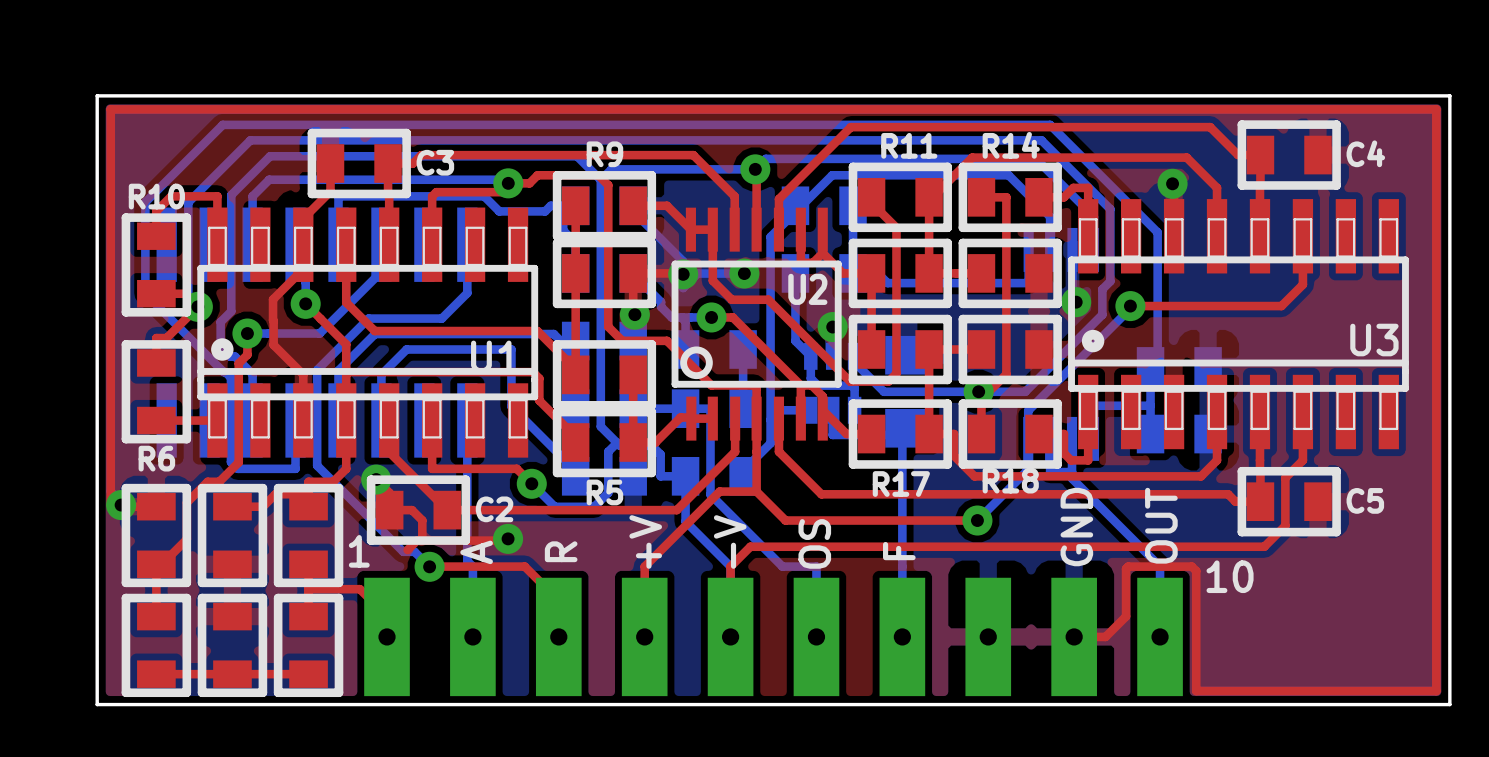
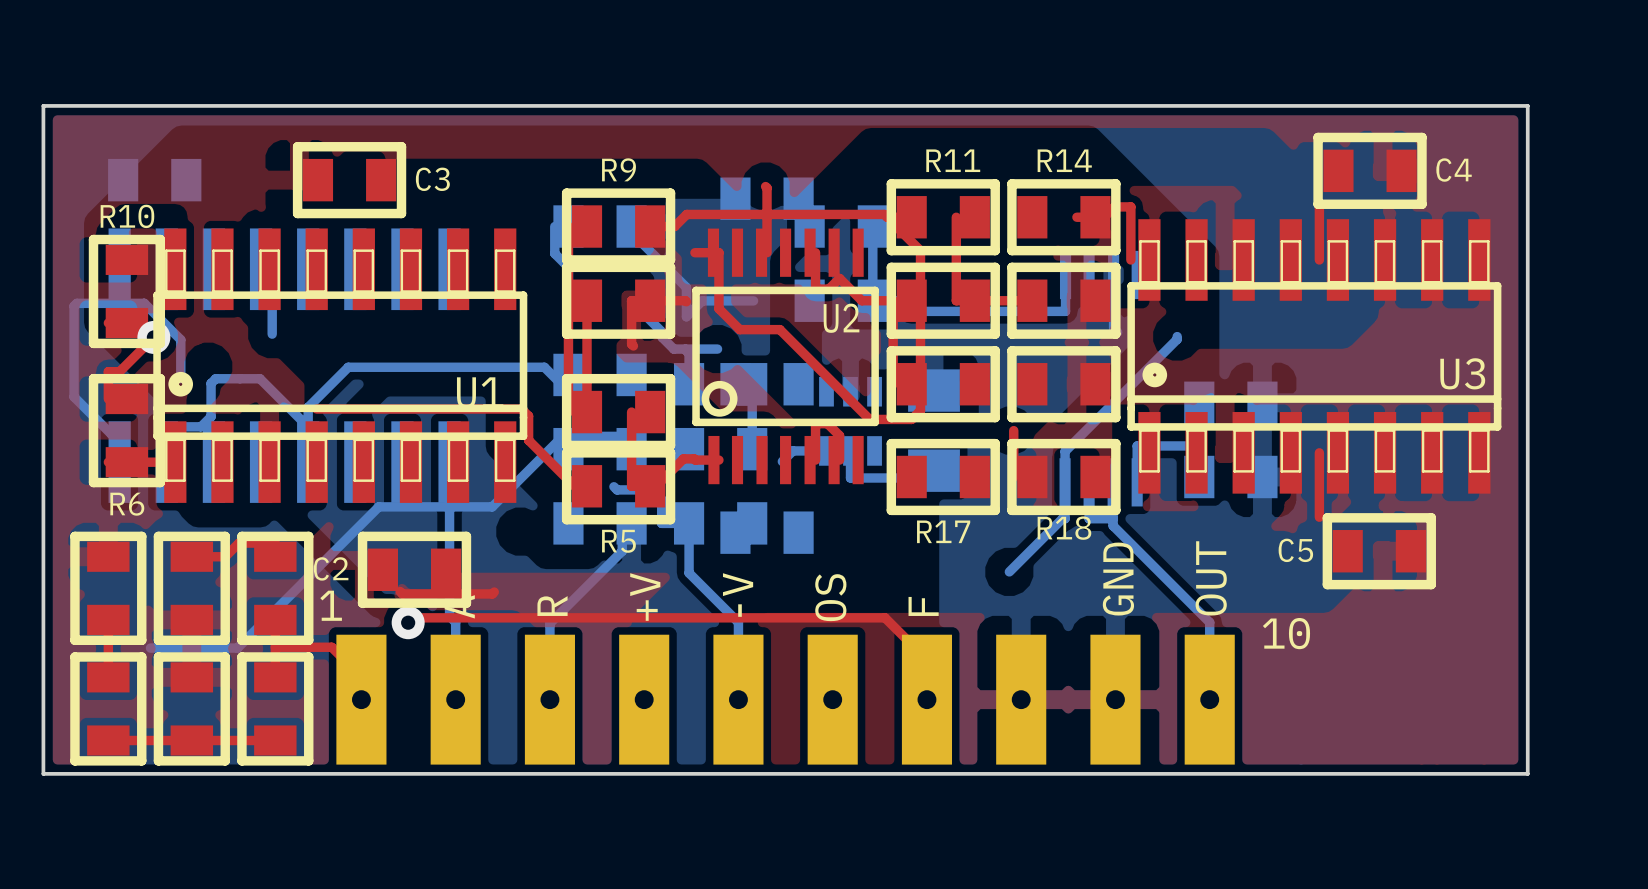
C4 position: (1289, 155) -> (1370, 170)
part: none -> (154, 180)
top track: (330, 163) (330, 191) (303, 218) (303, 269) (273, 299) (273, 345) (303, 374) (303, 420) -> none
C3 position: (359, 163) -> (349, 180)
via: (755, 169) -> none
bottom track: (600, 180) (600, 426) (617, 442) (608, 451) (608, 492) (594, 506) (554, 506) (531, 483) -> none
bottom track: (600, 180) (611, 169) (755, 169) (765, 158) (1036, 158) (1093, 216) (1093, 249) -> none
bottom track: (600, 180) (577, 156) (270, 156) (231, 195) (231, 311) (220, 322) (220, 347) (230, 356) (235, 356) (252, 374) (252, 420) -> none
part: none -> (767, 198)
bottom track: (508, 183) (504, 179) (269, 179) (252, 196) (252, 244) -> none
via: (508, 183) -> none
via: (1172, 183) -> none
top track: (1260, 185) (1260, 155) (1238, 155) (1210, 127) (850, 127) (778, 199) (778, 229) -> none
R11 position: (900, 197) -> (943, 217)
top track: (981, 197) (1006, 197) (1006, 374) (988, 391) (978, 391) -> none
R14 position: (1010, 197) -> (1063, 217)
top track: (929, 200) (972, 157) (1186, 157) (1217, 187) (1217, 236) -> none
bottom track: (575, 205) (550, 205) (545, 211) (499, 211) (484, 196) (338, 196) (338, 244) -> none
R9 position: (604, 205) -> (618, 226)
top track: (667, 205) (690, 229) (690, 246) -> (668, 226) (674, 226) (686, 214) (884, 214) (887, 217) (911, 217)
top track: (734, 229) (734, 196) (693, 155) (421, 155) (412, 163) (388, 163) (389, 244) -> none
top track: (156, 236) (156, 211) (171, 196) (217, 196) (217, 244) -> none
top track: (1302, 236) (1302, 284) (1281, 306) (1130, 306) -> none
top track: (346, 244) (346, 302) (374, 331) (537, 331) (575, 369) -> none
bottom track: (381, 244) (381, 271) (319, 333) (247, 333) -> none
top track: (432, 244) (432, 196) (436, 192) (508, 192) (508, 183) (529, 183) (537, 175) (598, 175) (608, 185) (608, 326) (622, 340) (666, 340) (711, 385) (754, 385) (756, 388) (756, 491) -> none
bottom track: (467, 244) (467, 293) (441, 318) (368, 318) (317, 370) (317, 465) (403, 551) (414, 551) (429, 566) -> none
bottom track: (1050, 249) (1050, 216) (1008, 175) (832, 175) (770, 236) (770, 443) (743, 470) (743, 476) -> none
R10 position: (156, 264) -> (126, 291)
top track: none -> (587, 300) (587, 412)
part position: (604, 273) -> (618, 300)
via: (744, 273) -> none
bottom track: (795, 273) (795, 341) (810, 356) (810, 378) (818, 385) (852, 385) (854, 388) (854, 410) -> none
part position: (900, 273) -> (943, 300)
part position: (1010, 273) -> (1063, 300)
via: (683, 274) -> none
via: (1076, 302) -> none
top track: (305, 303) (346, 344) (346, 468) (333, 481) (308, 481) (308, 506) -> none
via: (305, 303) -> none
bottom track: (197, 306) (188, 297) (188, 202) (250, 140) (1041, 140) (1110, 209) (1110, 281) (1102, 289) (1102, 314) (1025, 391) (883, 391) (854, 362) (854, 356) -> none
via: (1130, 306) -> none
via: (634, 314) -> none
top track: (711, 317) (732, 317) (800, 385) -> none
via: (711, 317) -> none
U2 position: (756, 324) -> (785, 356)
U3 position: (1238, 324) -> (1314, 356)
via: (832, 327) -> none
top track: (247, 333) (247, 354) (238, 363) (238, 462) (219, 481) (207, 481) (186, 502) (186, 539) (161, 564) (156, 564) -> none
via: (247, 333) -> none
bottom track: none -> (180, 378) (180, 339) (144, 303) (76, 303) (74, 306) (74, 396) (111, 434) (117, 434) (117, 482)
part: none -> (767, 384)
part position: (900, 349) -> (943, 384)
top track: (981, 349) (929, 349) (929, 434) (954, 434) (954, 455) (974, 476) (1201, 476) (1217, 460) (1217, 412) -> none
part position: (1010, 349) -> (1063, 384)
part position: (604, 374) -> (618, 412)
bottom track: none -> (180, 426) (201, 426) (211, 416) (211, 383) (215, 378) (259, 378) (315, 434) (321, 434)
R6 position: (156, 391) -> (126, 430)
via: (978, 391) -> none
bottom track: none -> (622, 436) (562, 436) (492, 506) (378, 506) (237, 648) (150, 648)
bottom track: (633, 408) (710, 408) (710, 494) (782, 566) (816, 566) (816, 636) -> none
top track: (822, 410) (846, 434) (871, 434) -> none
top track: (1088, 412) (1088, 460) (1071, 460) (1063, 453) (1063, 434) (1039, 434) -> none
top track: (1302, 412) (1302, 460) (1285, 477) (1285, 525) (1264, 546) (750, 546) (730, 566) (730, 636) -> none
top track: (735, 418) (735, 451) (676, 510) (447, 510) (389, 452) (389, 420) -> none
top track: (778, 418) (778, 451) (821, 494) (1228, 494) (1235, 501) (1260, 501) (1260, 471) -> none
bottom track: (295, 420) (295, 468) (237, 468) (230, 462) (230, 377) (145, 293) (145, 202) (222, 124) (1050, 124) (1157, 232) (1157, 359) (1150, 366) (1150, 434) -> none
bottom track: (381, 420) (381, 374) (406, 349) (511, 349) (511, 406) (575, 470) (575, 476) -> none
top track: (432, 420) (432, 468) (516, 468) (531, 483) -> none
R17 position: (900, 434) -> (943, 477)
bottom track: (902, 434) (902, 636) -> none
R18 position: (1010, 434) -> (1063, 477)
R5 position: (604, 442) -> (618, 486)
top track: (376, 479) (389, 493) (389, 510) (412, 510) (422, 520) (422, 540) (417, 540) (407, 550) -> none
via: (376, 479) -> none
bottom track: none -> (622, 530) (622, 551) (549, 623) (549, 699)
via: (531, 483) -> none
part: none -> (767, 532)
top track: (756, 491) (719, 491) (644, 566) (644, 636) -> none
top track: (756, 491) (785, 520) (977, 520) -> none
C5 name position: C5 (1365, 500) -> C5 (1295, 550)
C5 position: (1289, 501) -> (1379, 551)
via: (121, 505) -> none
top track: (156, 506) (110, 505) (110, 109) (1436, 109) (1436, 691) (1196, 691) (1196, 571) (1191, 566) (1128, 566) (1126, 568) (1126, 616) (1105, 636) (1074, 636) -> none
C2 name position: C2 (494, 509) -> C2 (331, 568)
C2 position: (418, 510) -> (414, 569)
via: (977, 520) -> none
via: (508, 538) -> none
top track: none -> (403, 617) (885, 617) (926, 659) (926, 699)
top track: (429, 566) (524, 566) (558, 600) (558, 636) -> none

